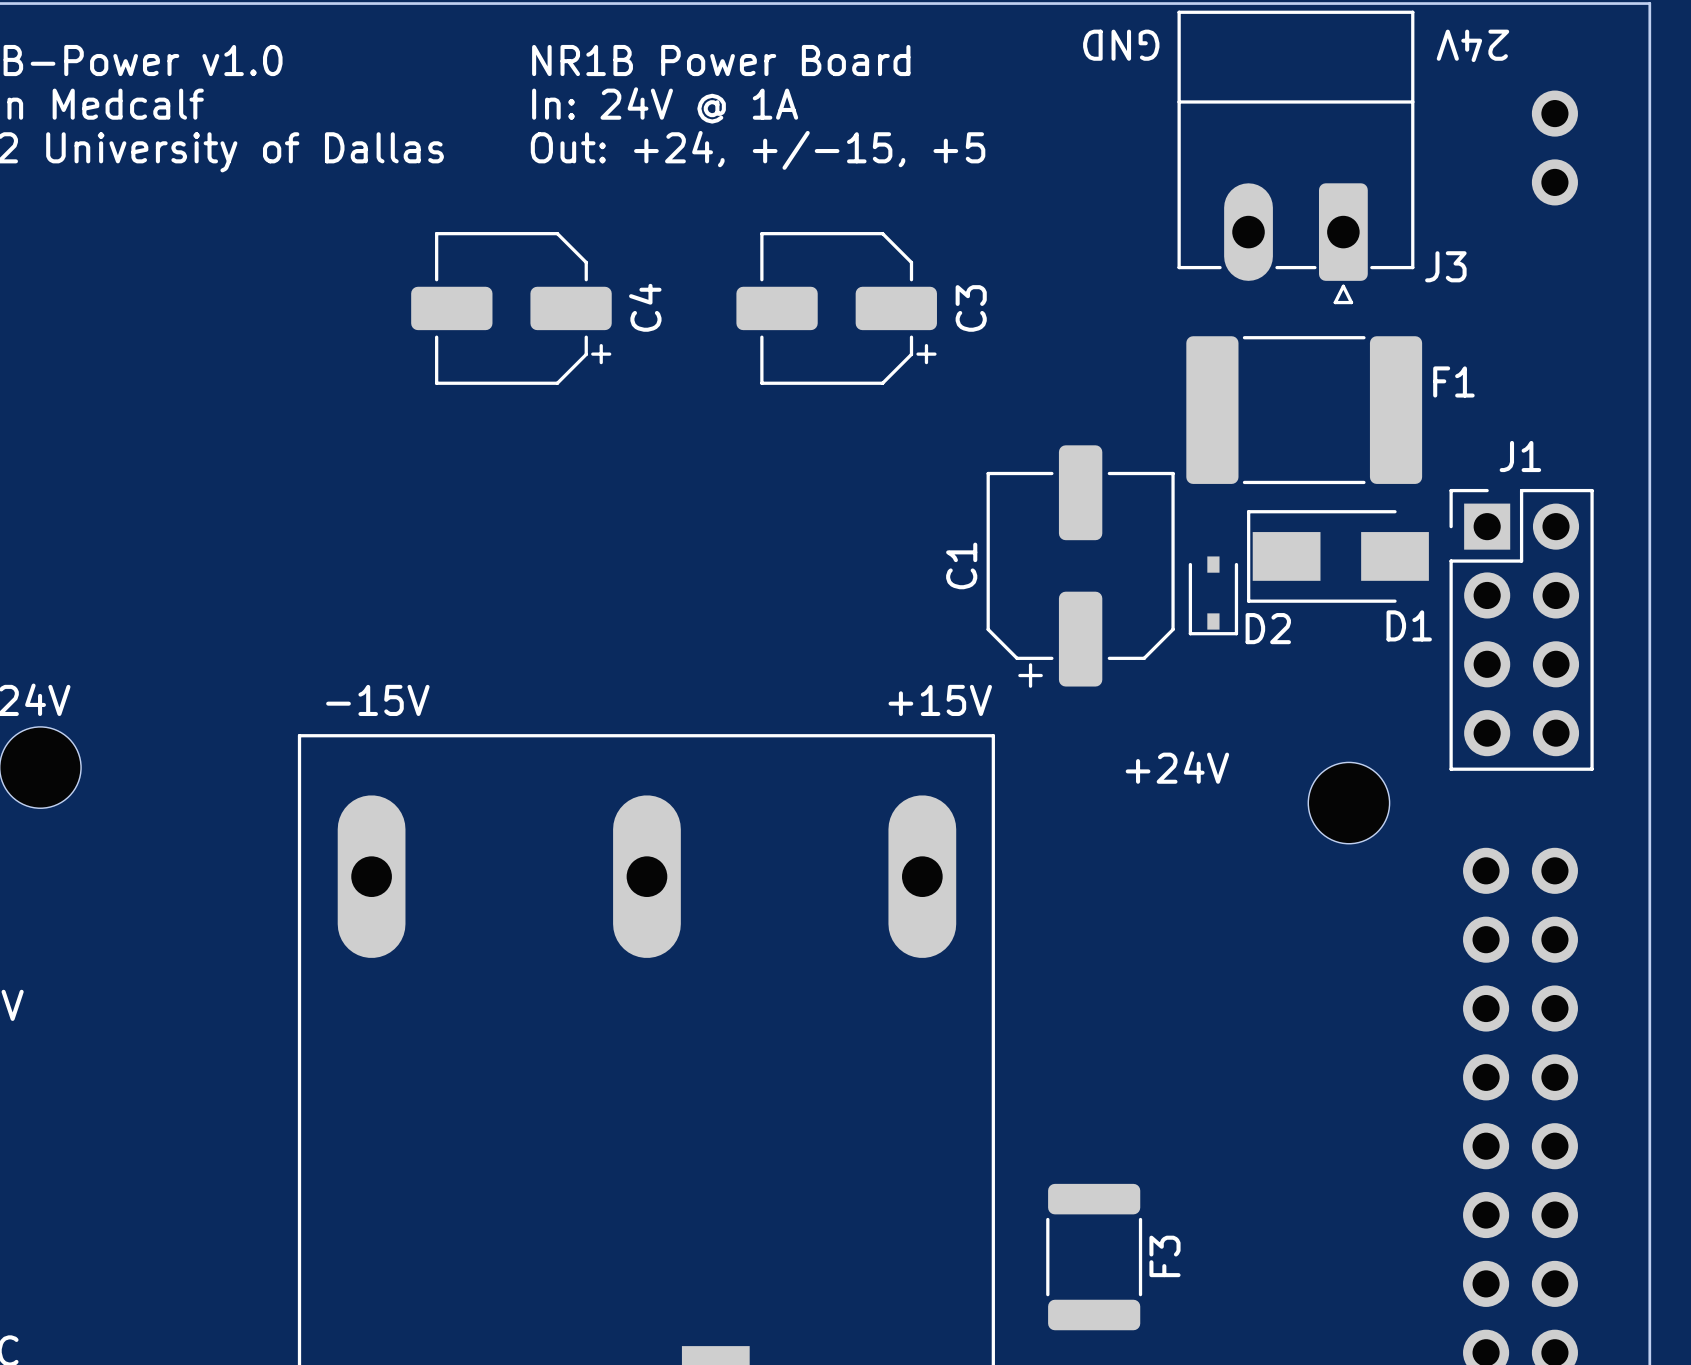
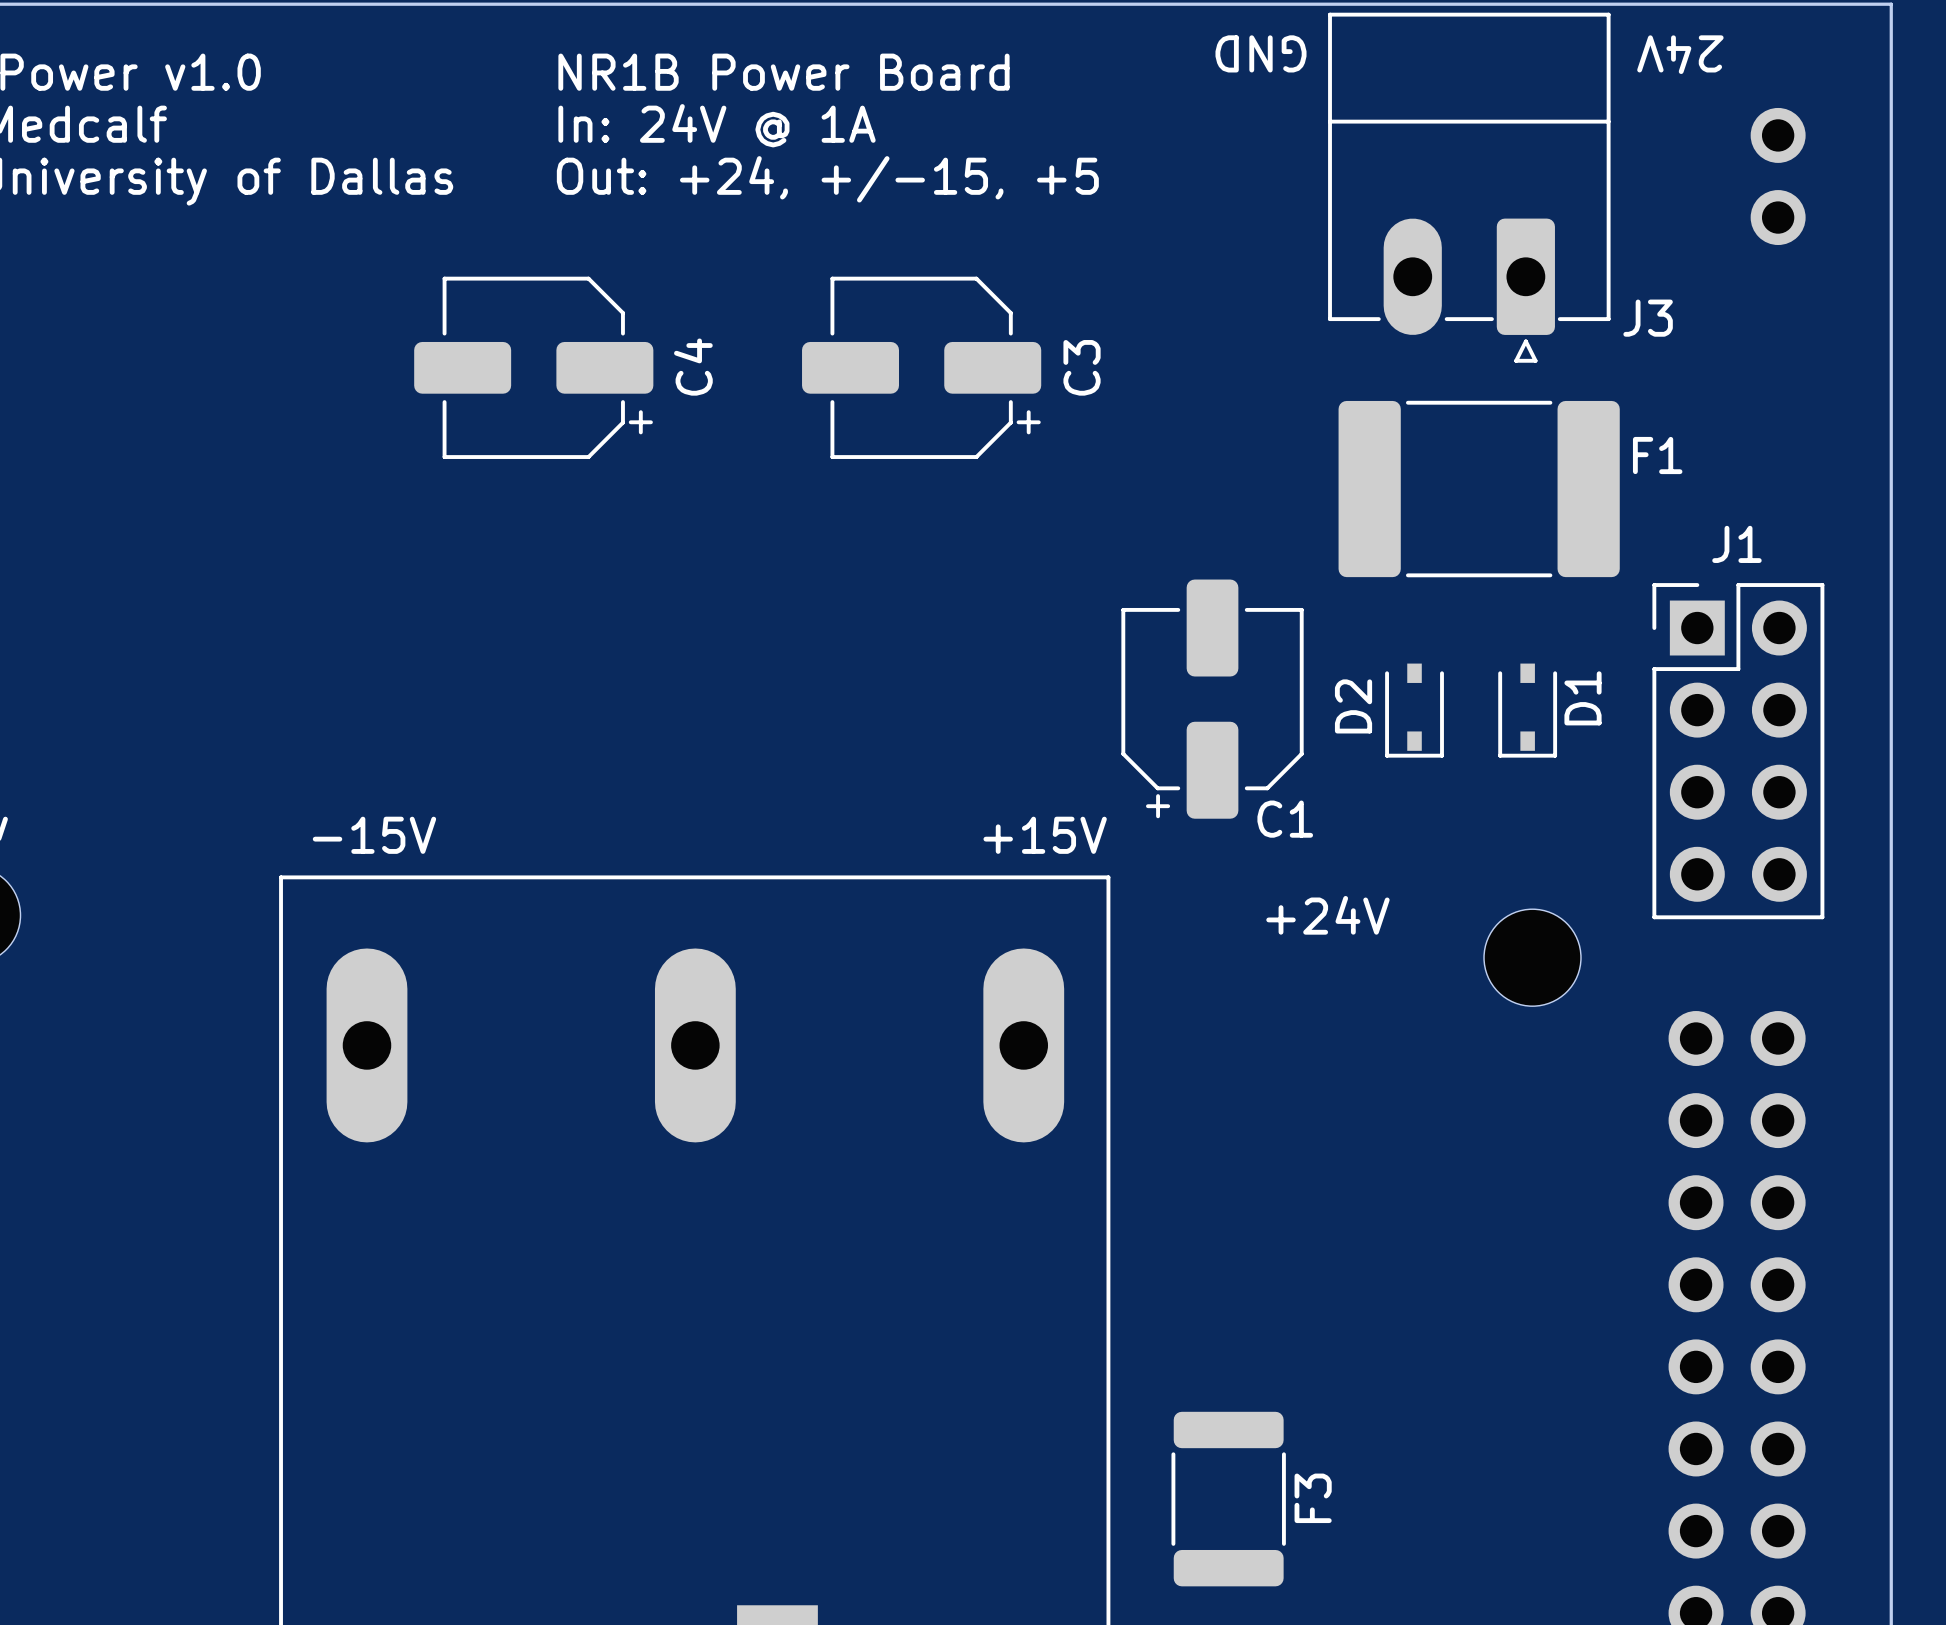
C1 footprint: [986, 445, 1175, 688] -> [1121, 579, 1304, 819]
D1 footprint: [1247, 510, 1429, 603] -> [1498, 663, 1558, 758]
C1 name position: C1 (961, 565) -> C1 (1285, 819)
D2 position: (1213, 595) -> (1414, 710)
D1 name position: D1 (1409, 625) -> D1 (1583, 698)
D2 name rotation: 0° (1268, 628) -> 90° counterclockwise (1353, 706)
D2 name position: D2 (1268, 628) -> D2 (1353, 706)

